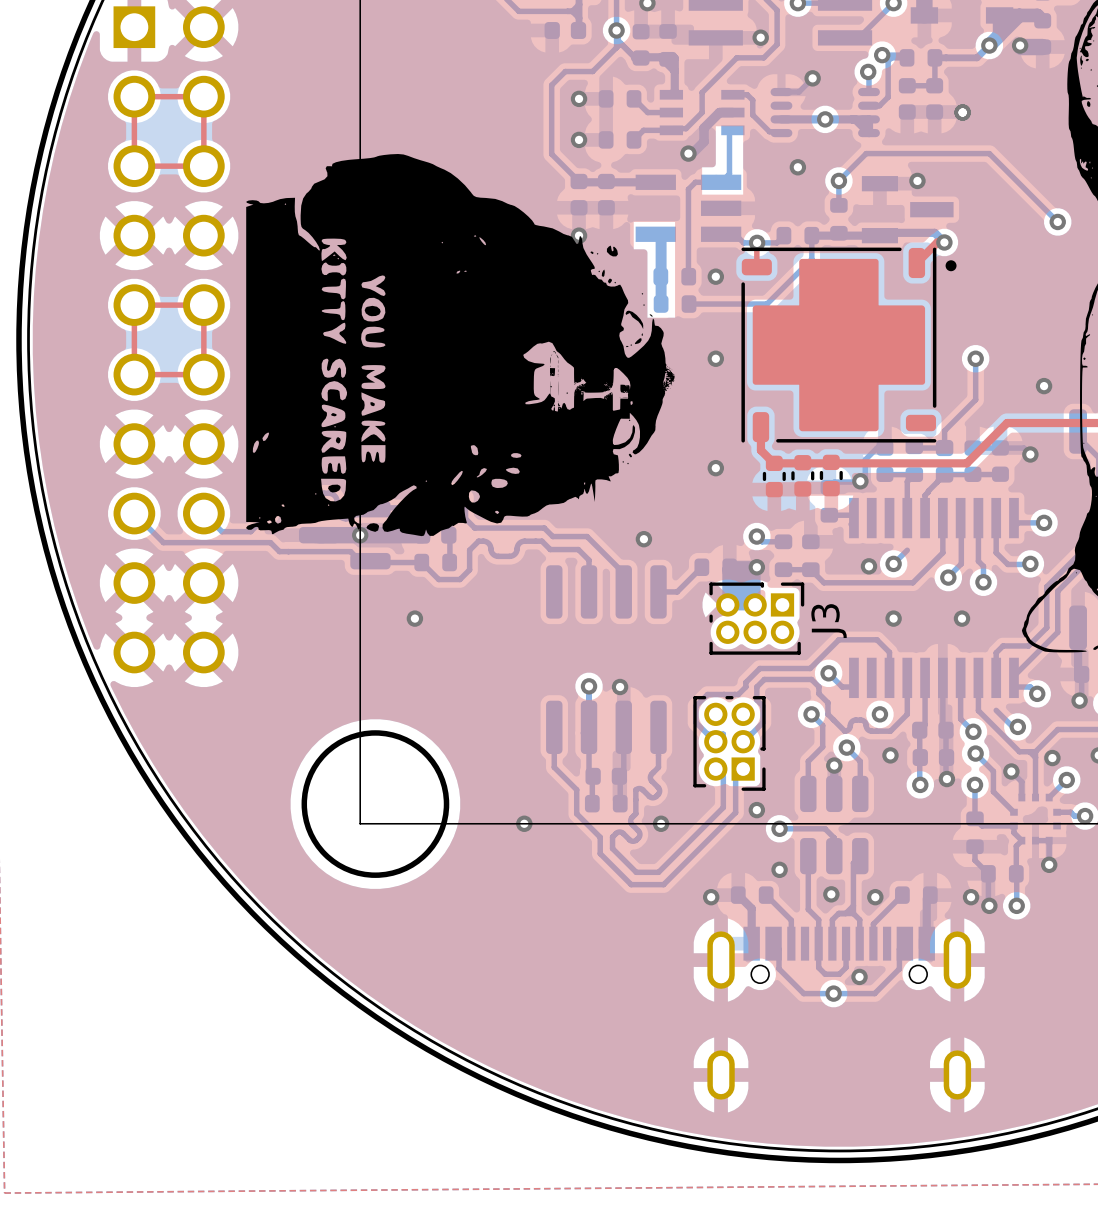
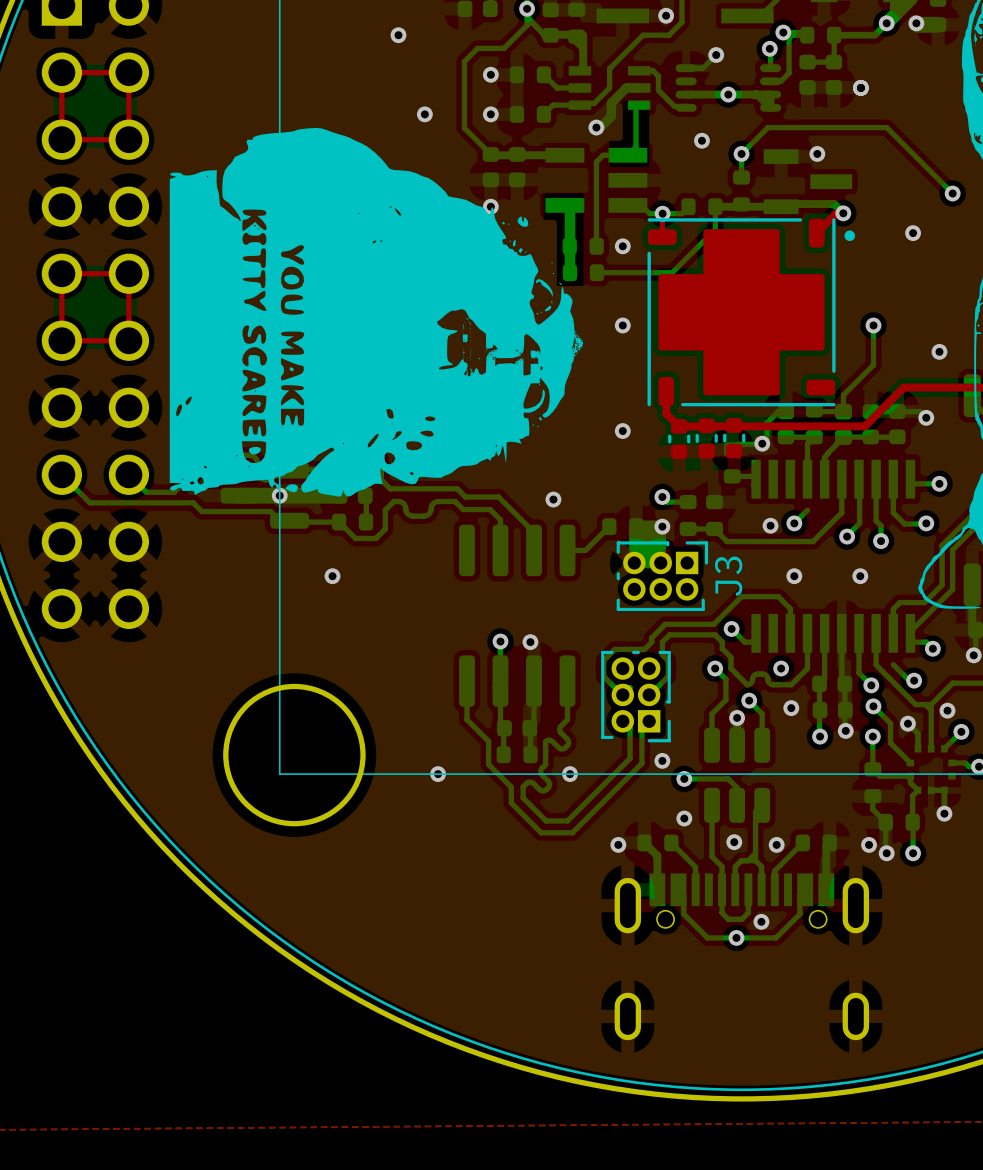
via: none -> (398, 35)
via: none -> (424, 114)
via: none -> (913, 233)

